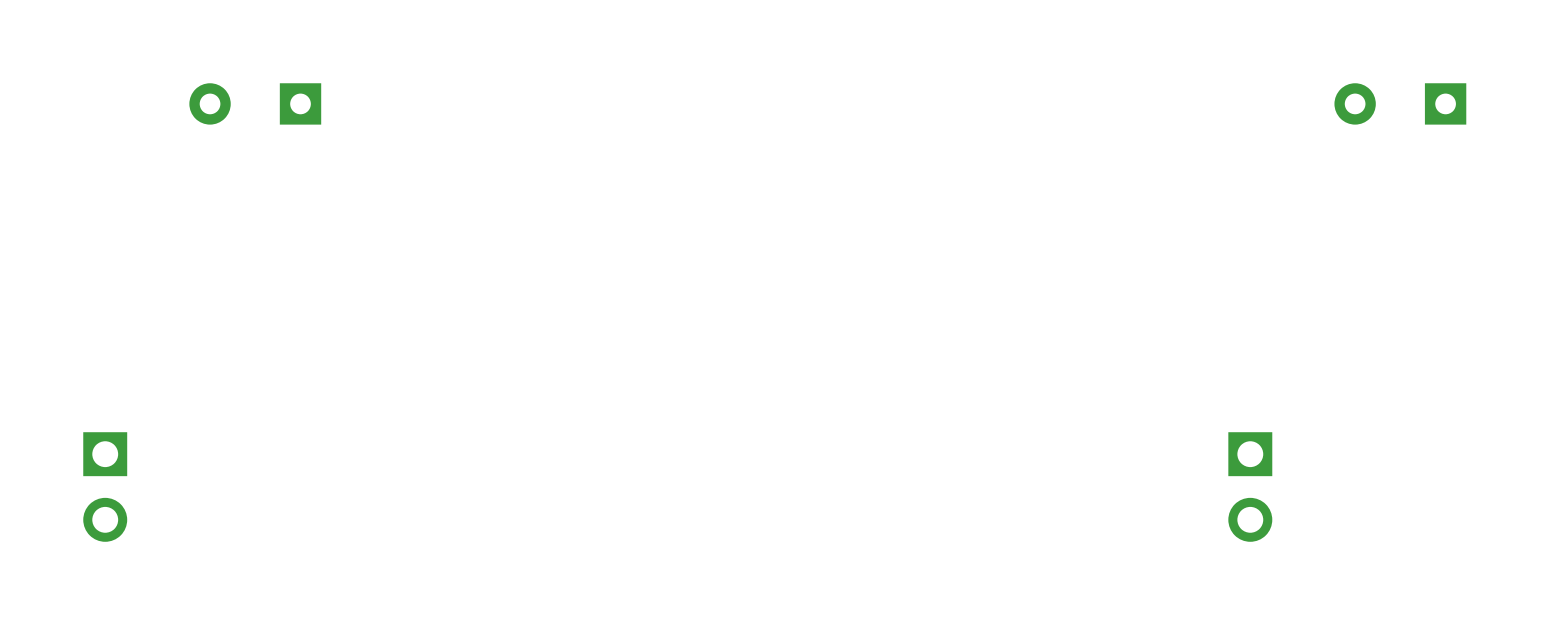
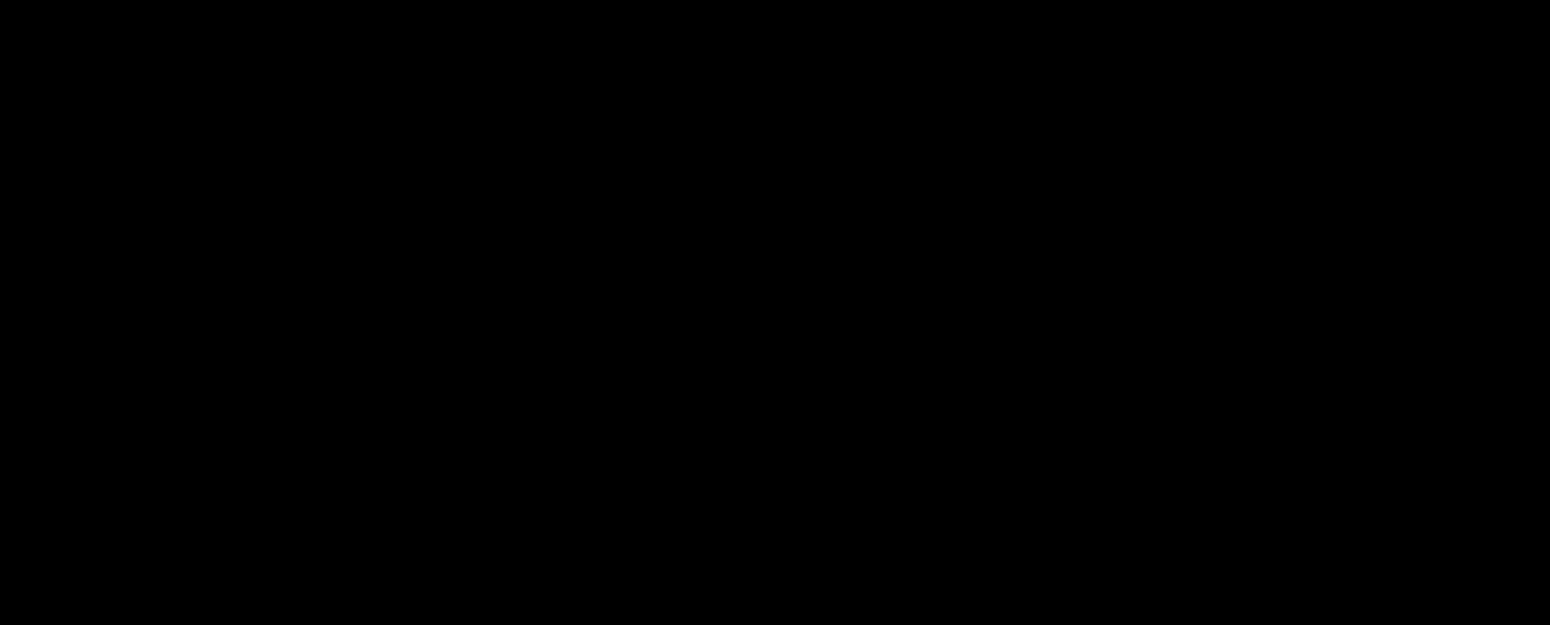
part: (255, 103) -> none
part: (1400, 103) -> none
part: (105, 487) -> none
part: (1250, 487) -> none

